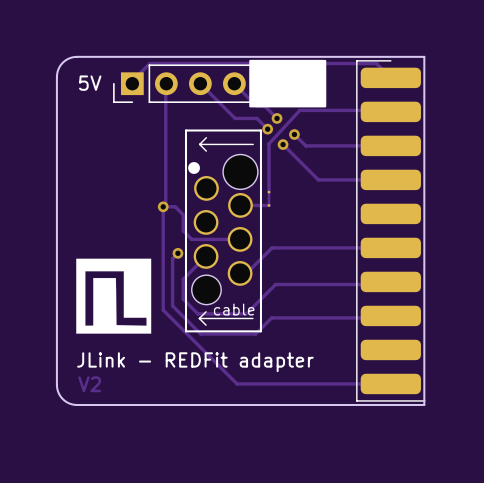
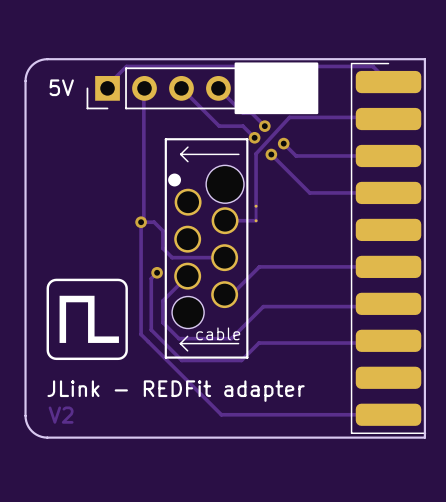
drawing shape: [76, 258, 152, 334] -> [46, 278, 128, 361]

